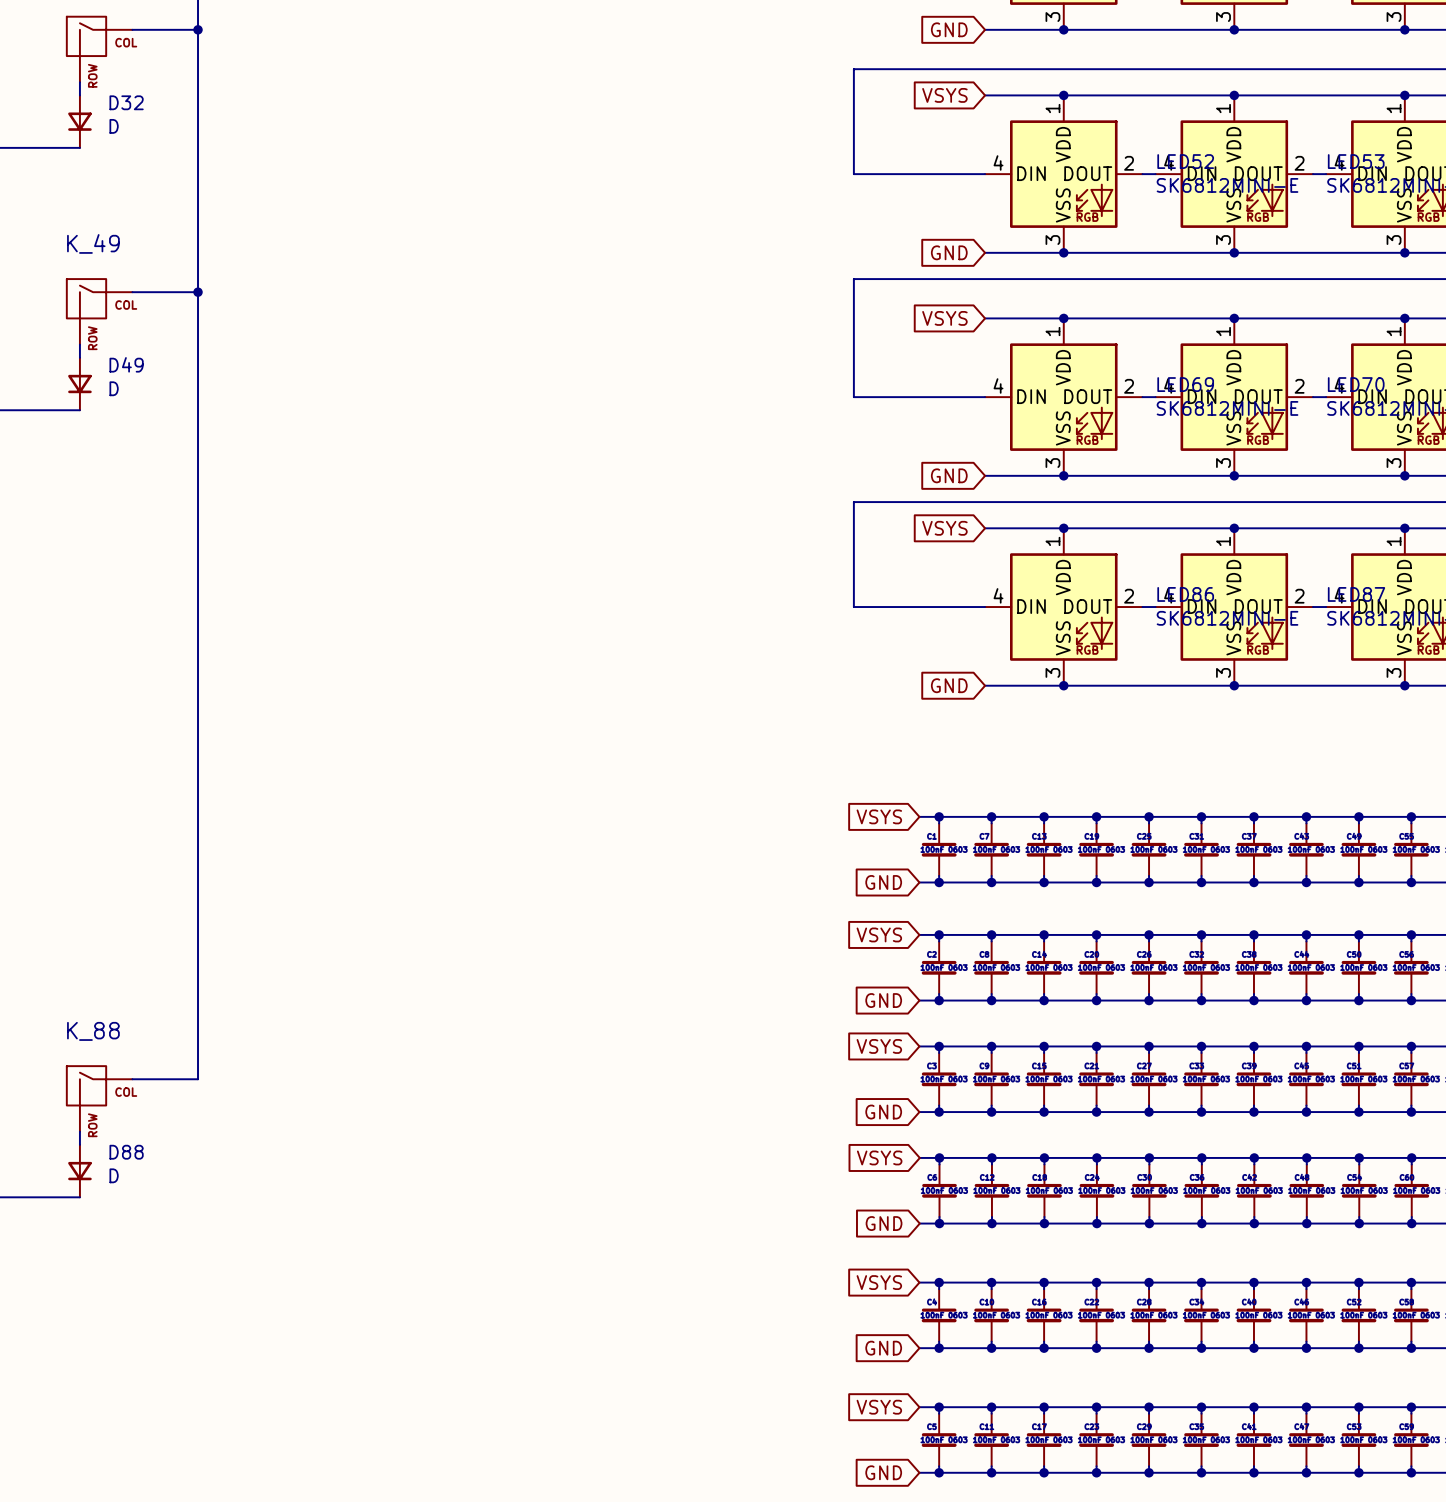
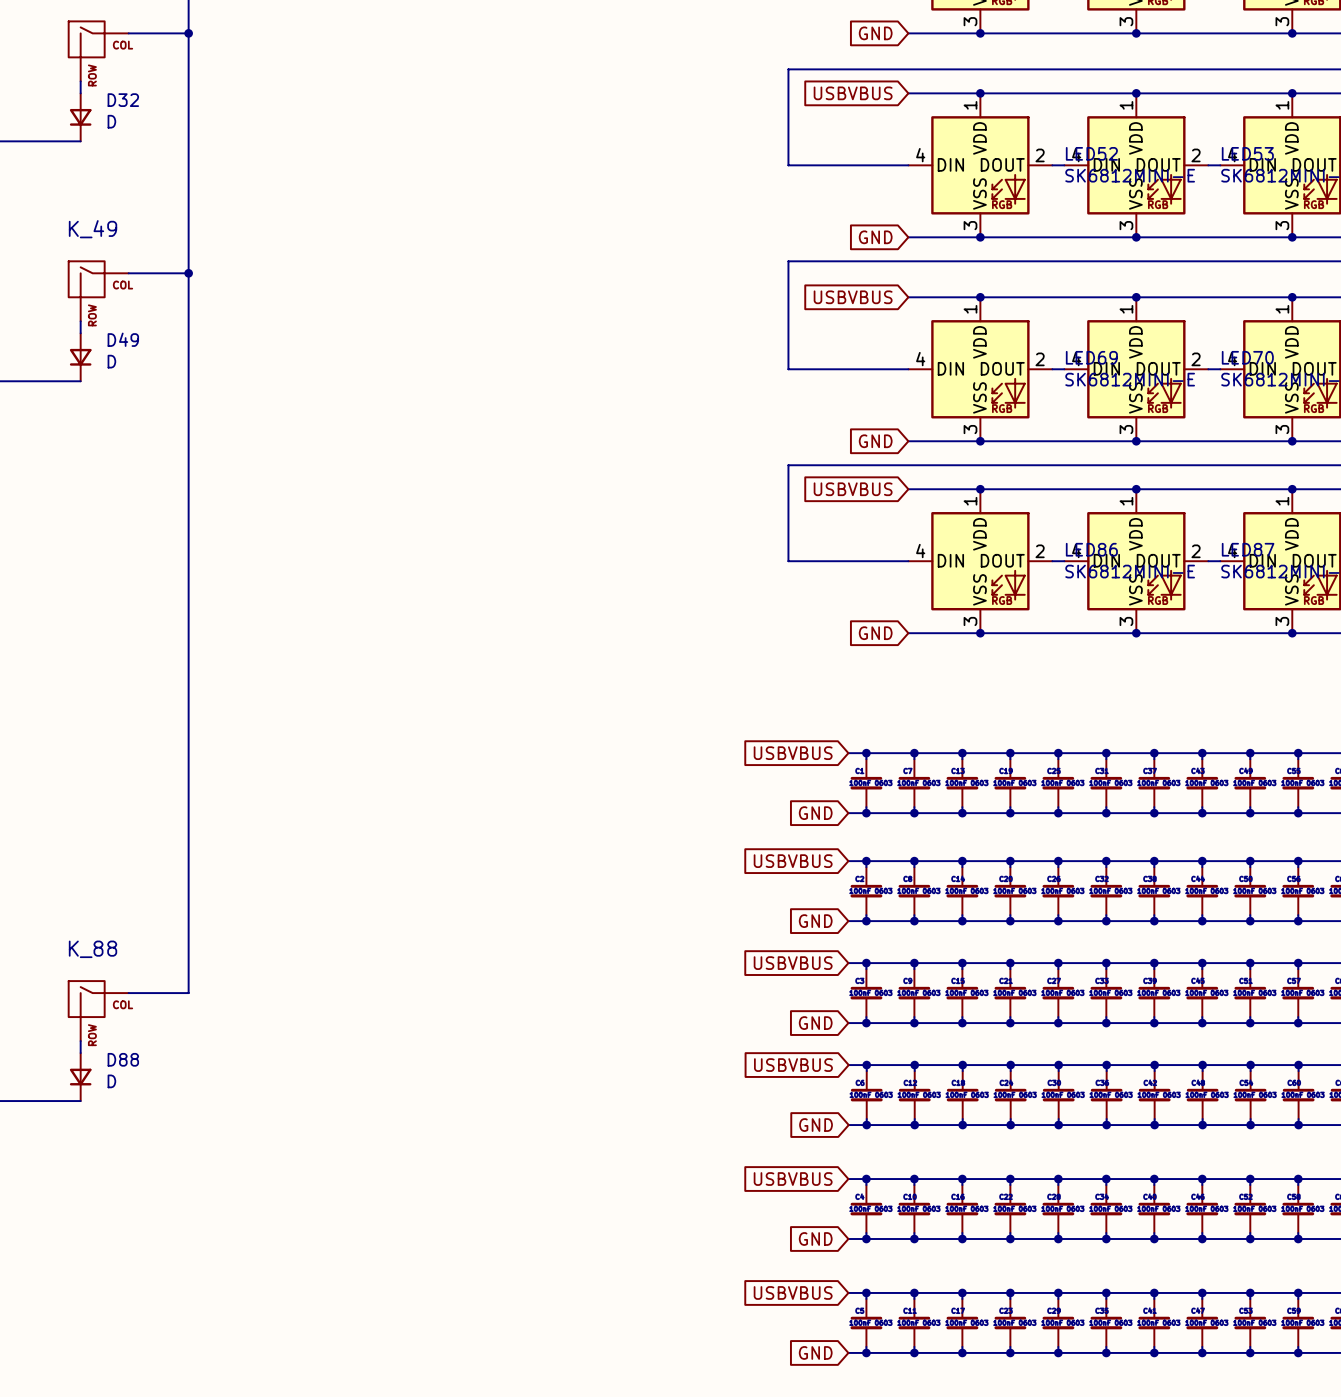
global label: VSYS (944, 95) -> USBVBUS (853, 93)
global label: VSYS (944, 318) -> USBVBUS (853, 297)
global label: VSYS (944, 528) -> USBVBUS (853, 489)
global label: VSYS (879, 816) -> USBVBUS (793, 753)
global label: VSYS (879, 934) -> USBVBUS (793, 861)
global label: VSYS (879, 1046) -> USBVBUS (793, 963)
global label: VSYS (879, 1157) -> USBVBUS (793, 1065)
global label: VSYS (879, 1282) -> USBVBUS (793, 1179)
global label: VSYS (879, 1407) -> USBVBUS (793, 1292)

